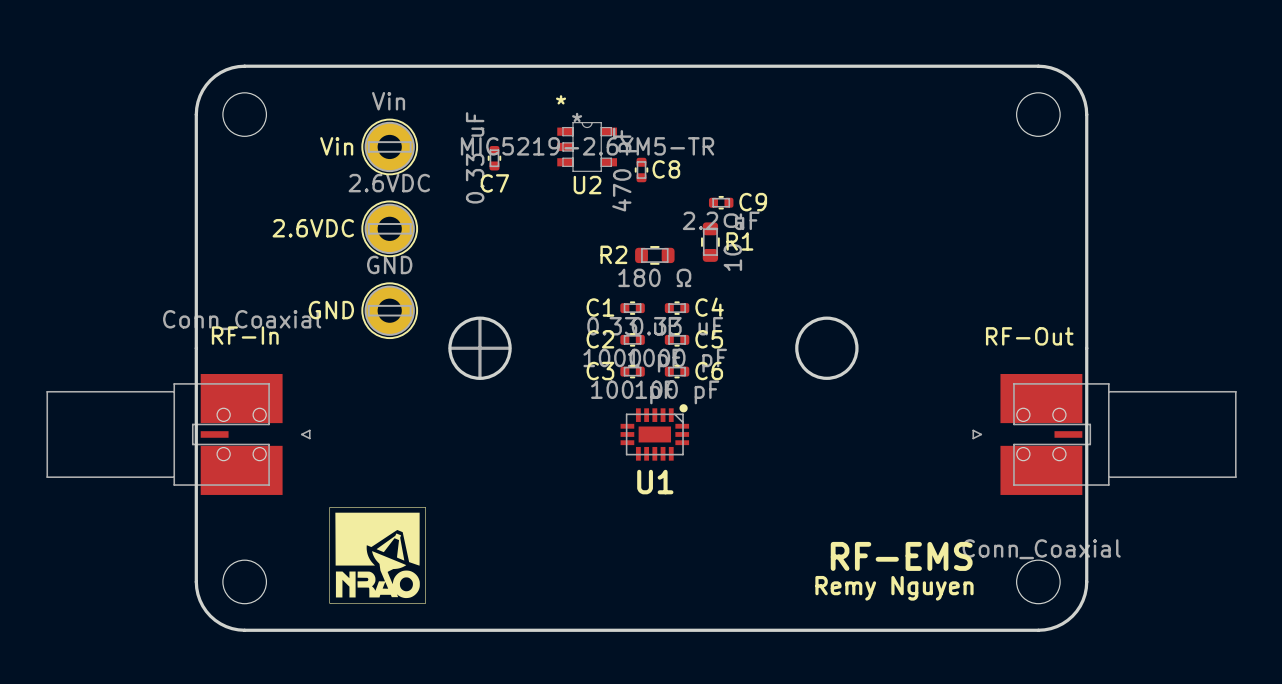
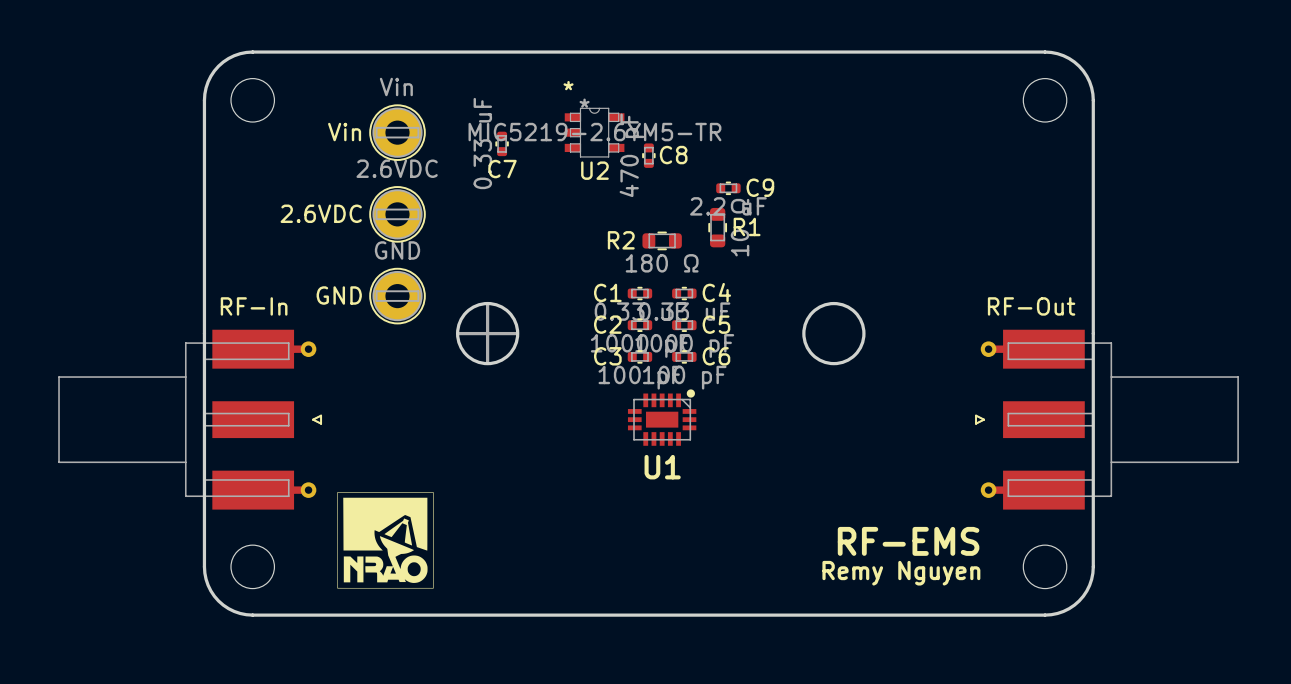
RF-In value: Conn_Coaxial (242, 320) -> none
RF-In footprint: [46, 373, 311, 495] -> [58, 329, 323, 510]
RF-Out footprint: [972, 373, 1237, 495] -> [975, 329, 1239, 510]
RF-Out value: Conn_Coaxial (1041, 549) -> none

